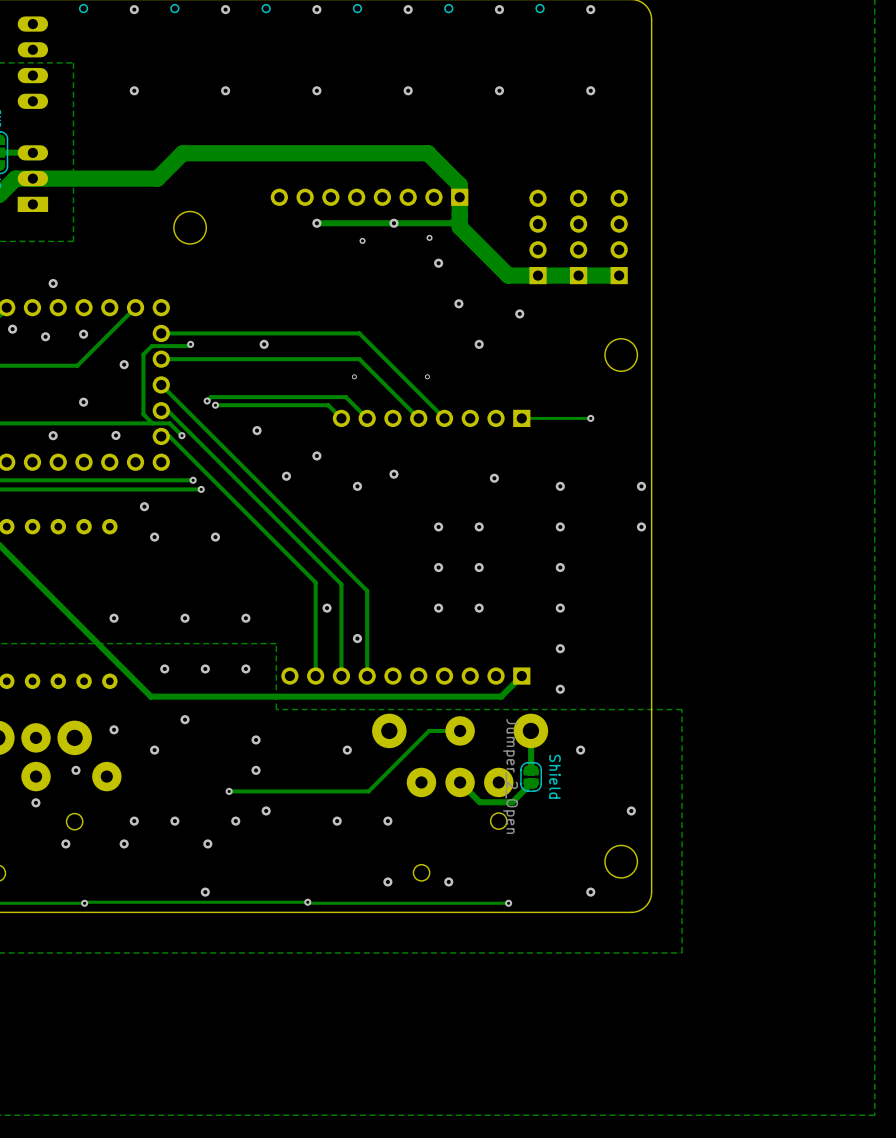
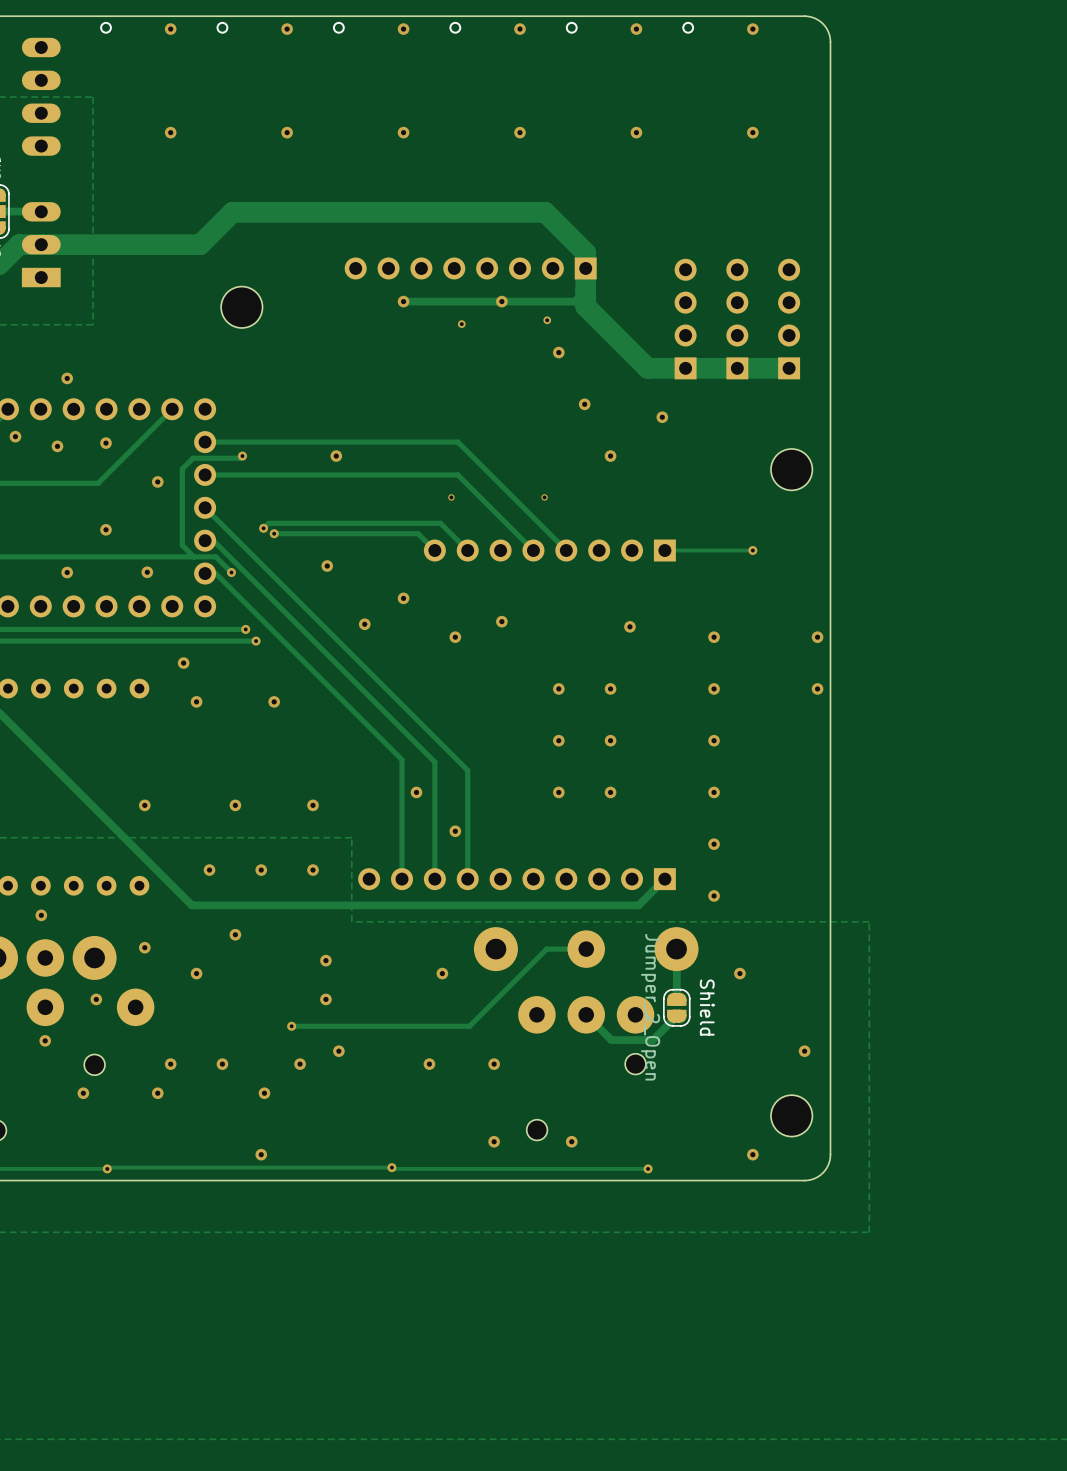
via: none -> (41, 915)

